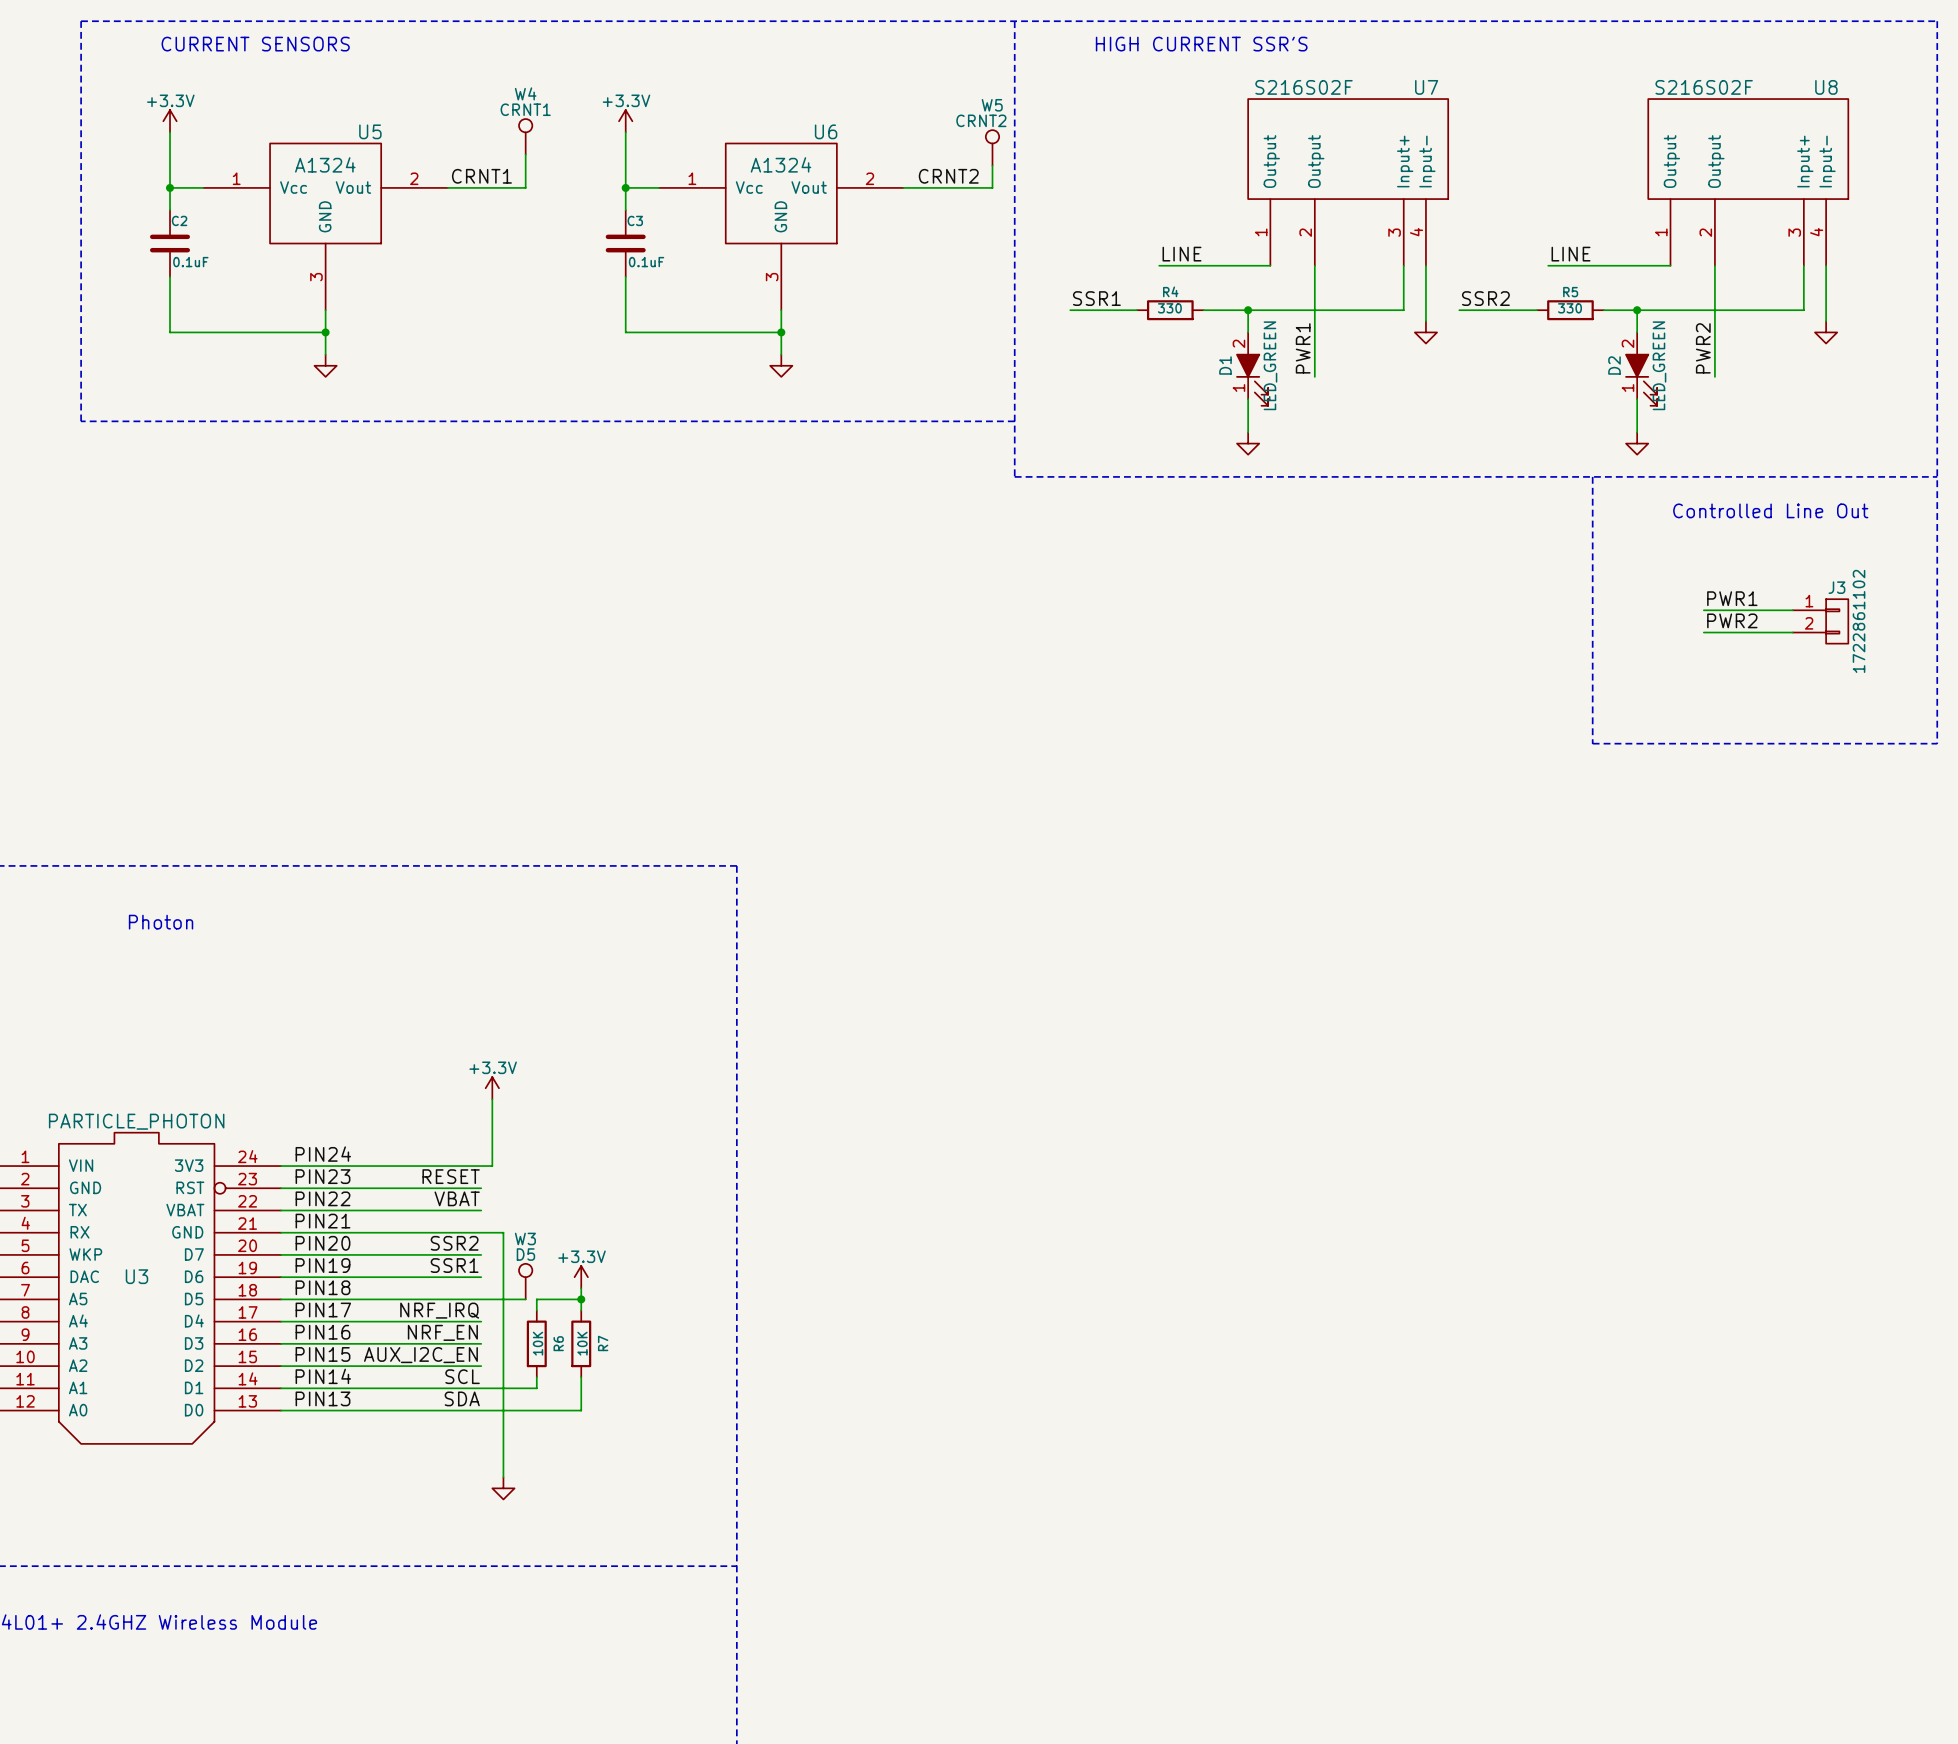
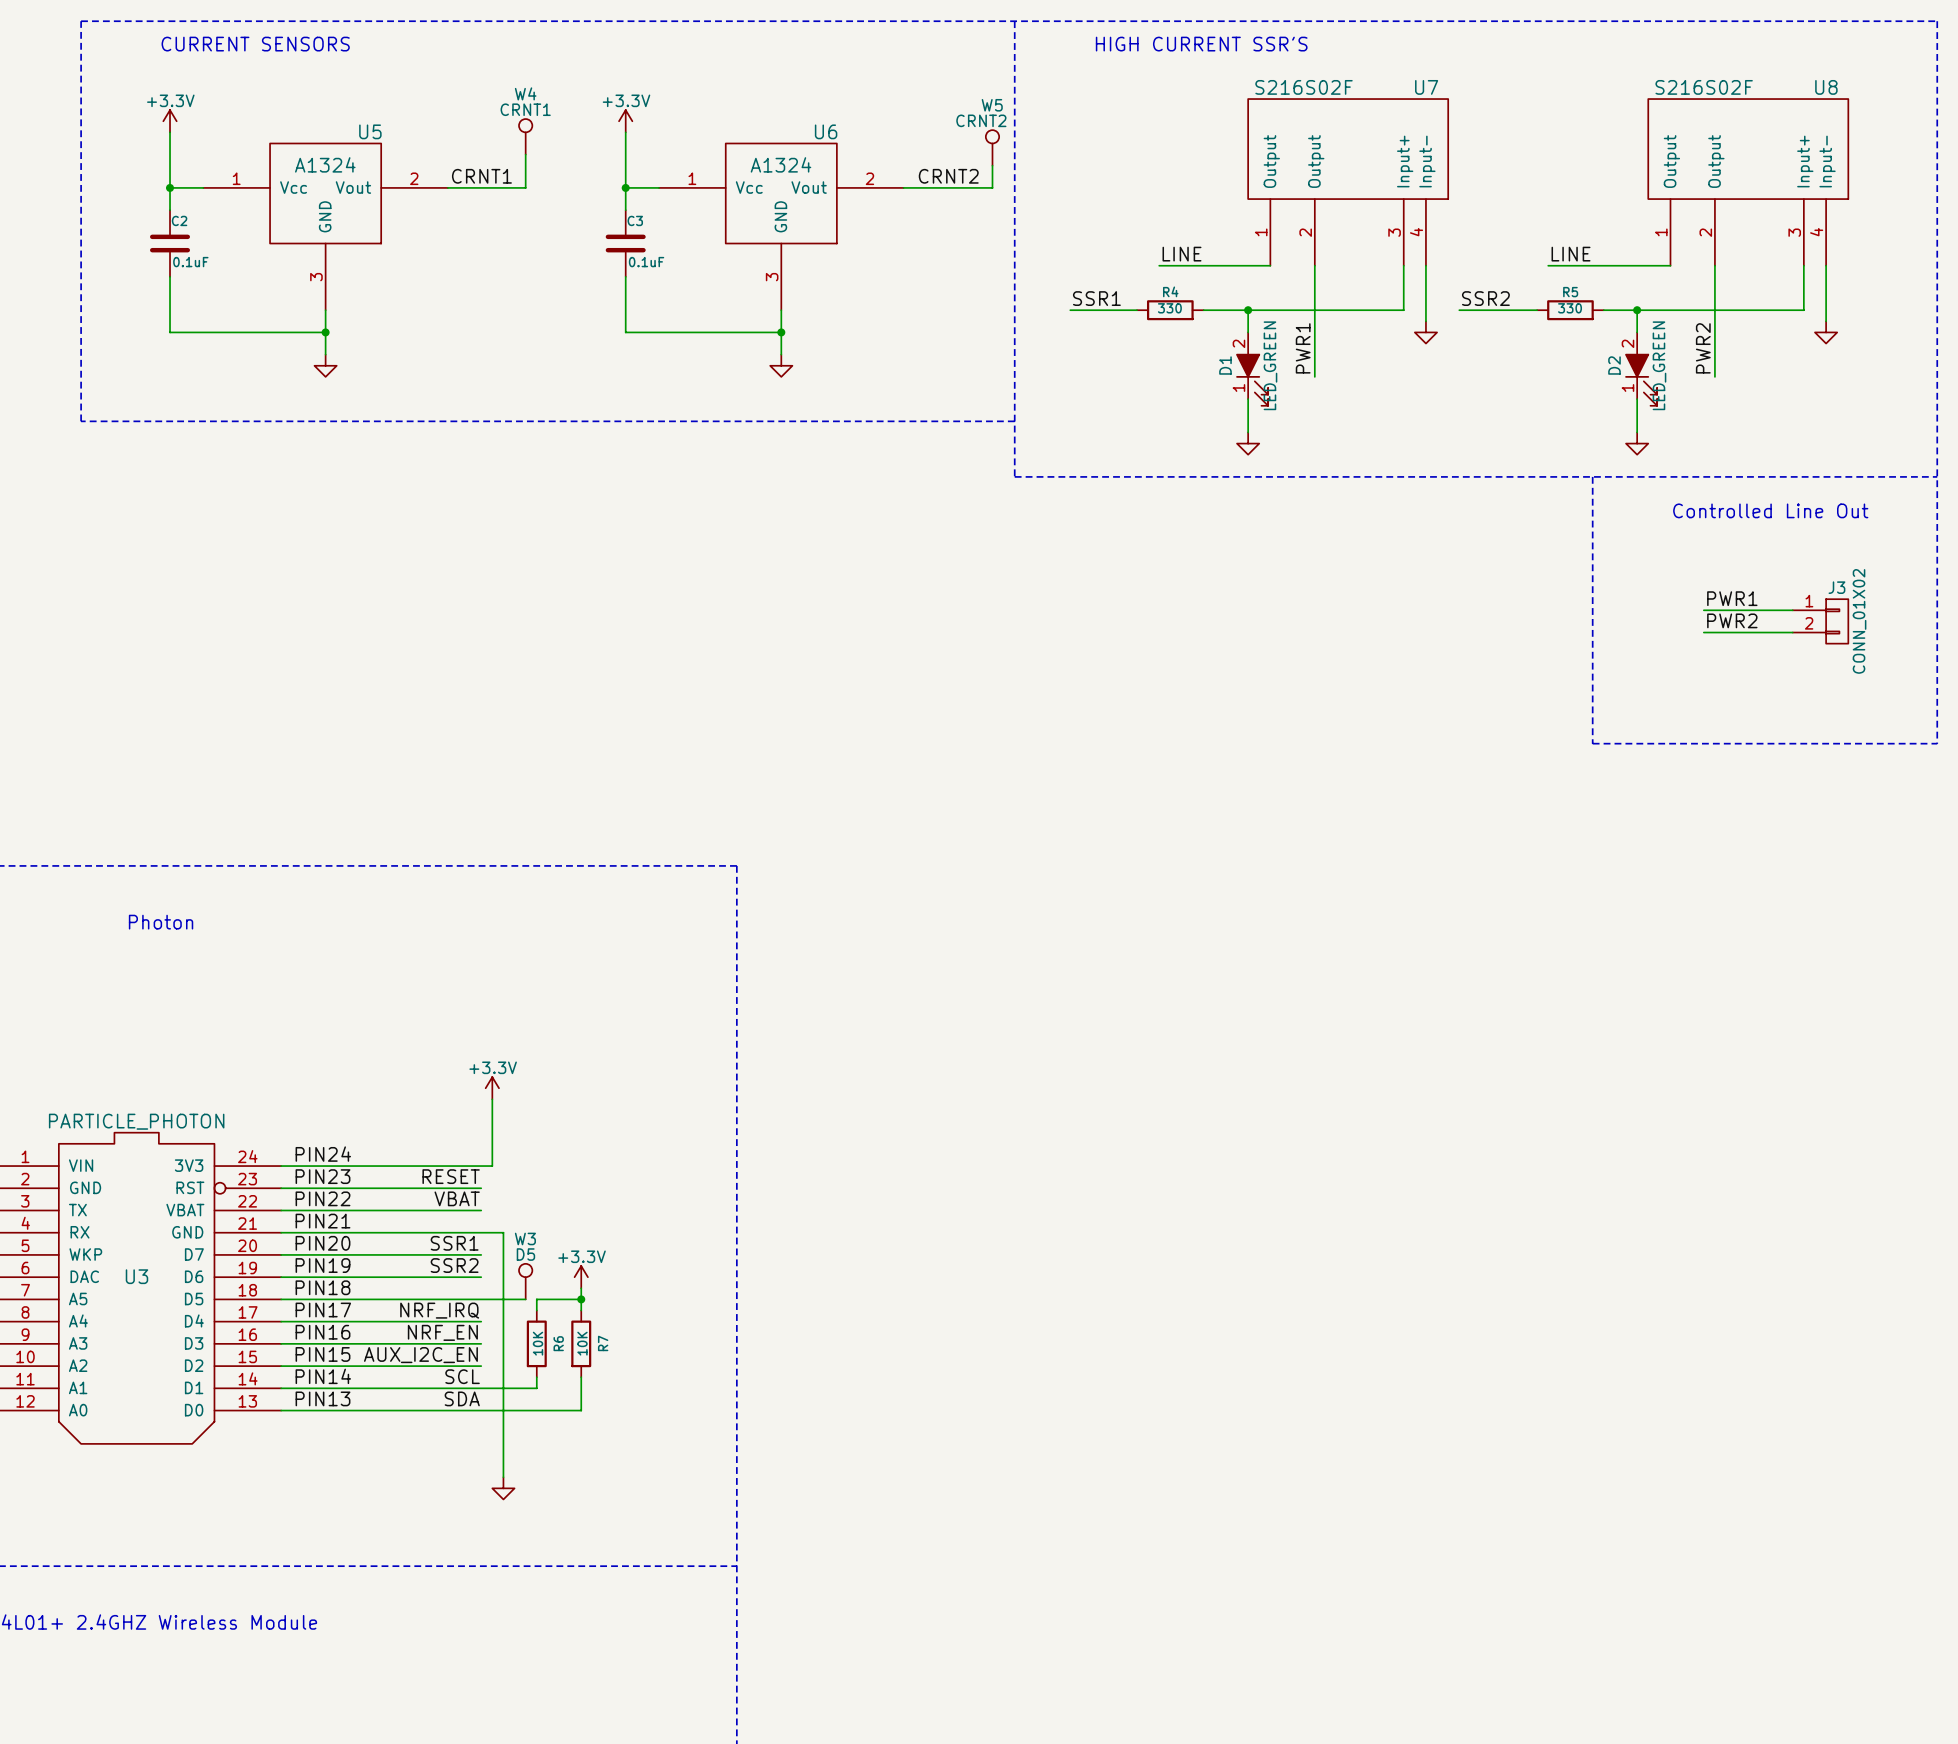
J3 value: 1722861102 (1859, 621) -> CONN_01X02 (1859, 621)
label: SSR2 (454, 1243) -> SSR1 (454, 1243)
label: SSR1 (454, 1265) -> SSR2 (454, 1265)

